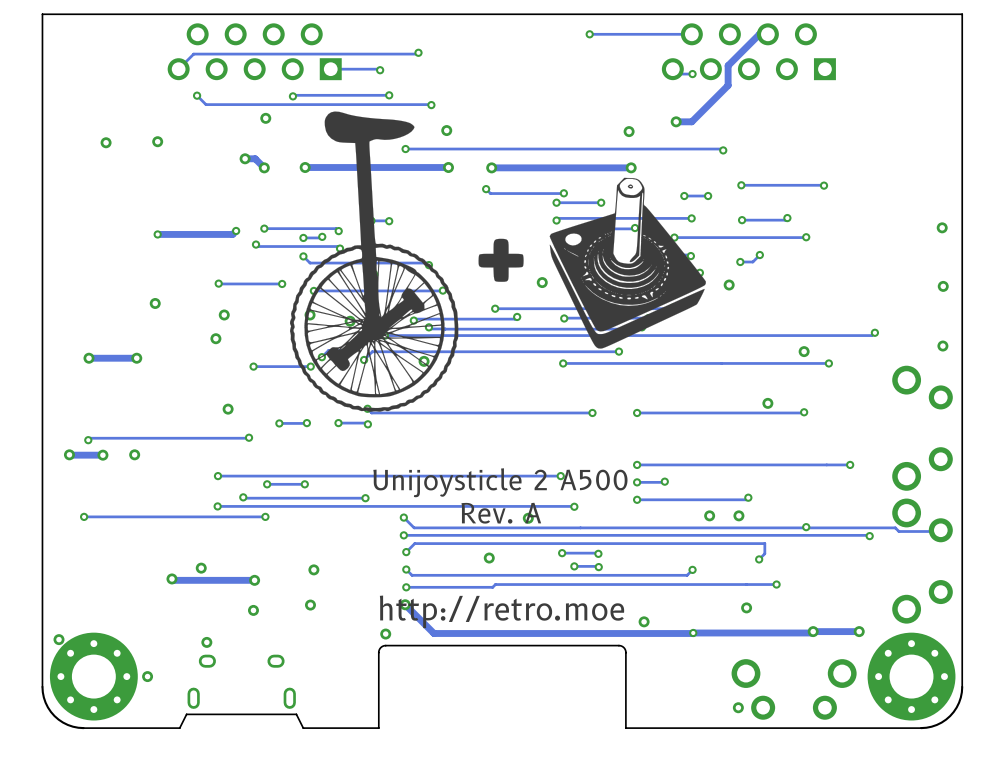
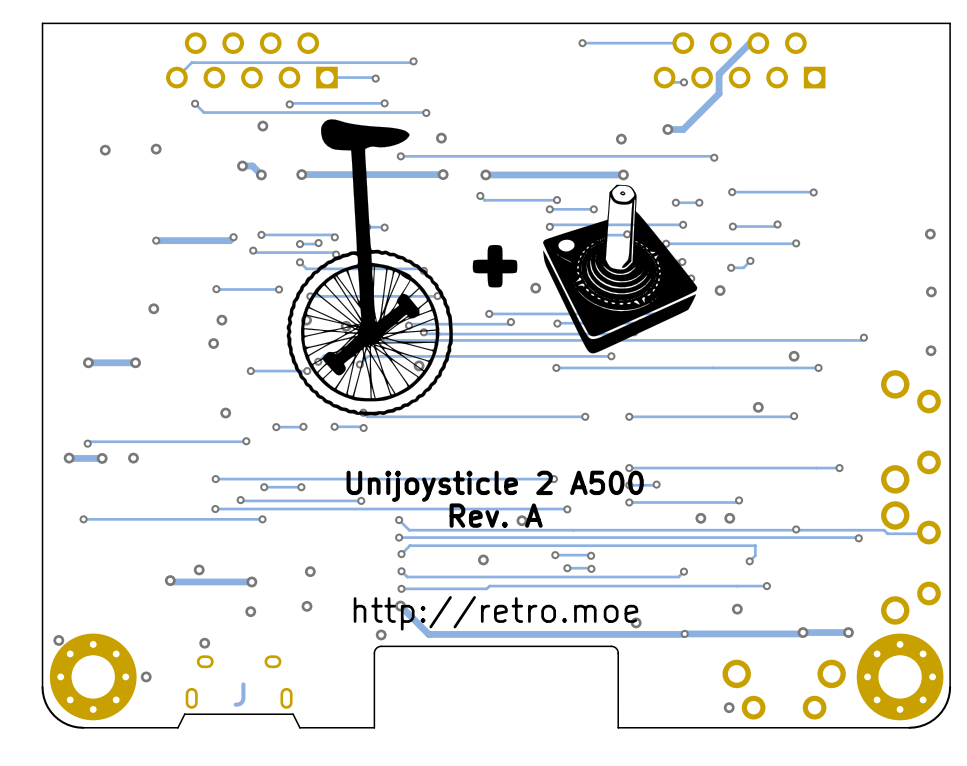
text: none -> J (239, 694)

